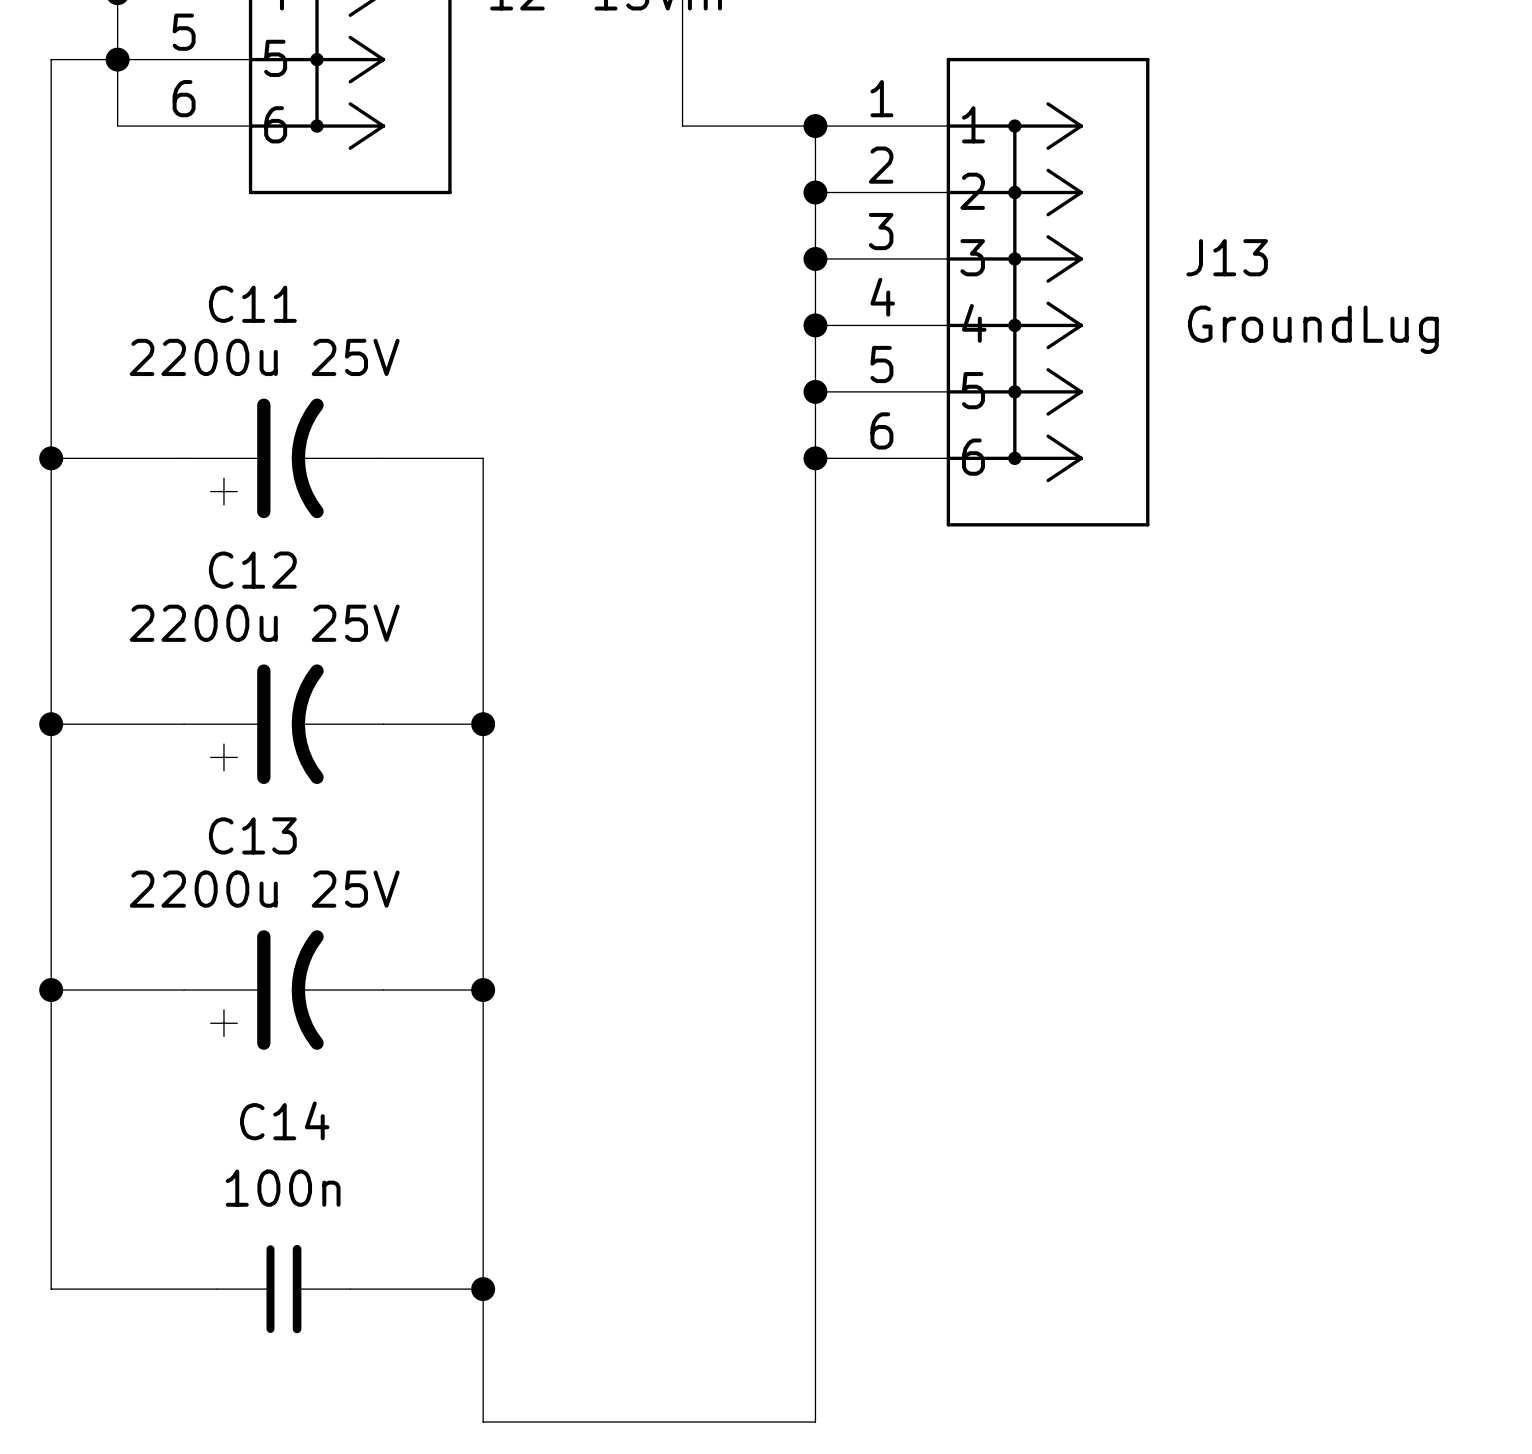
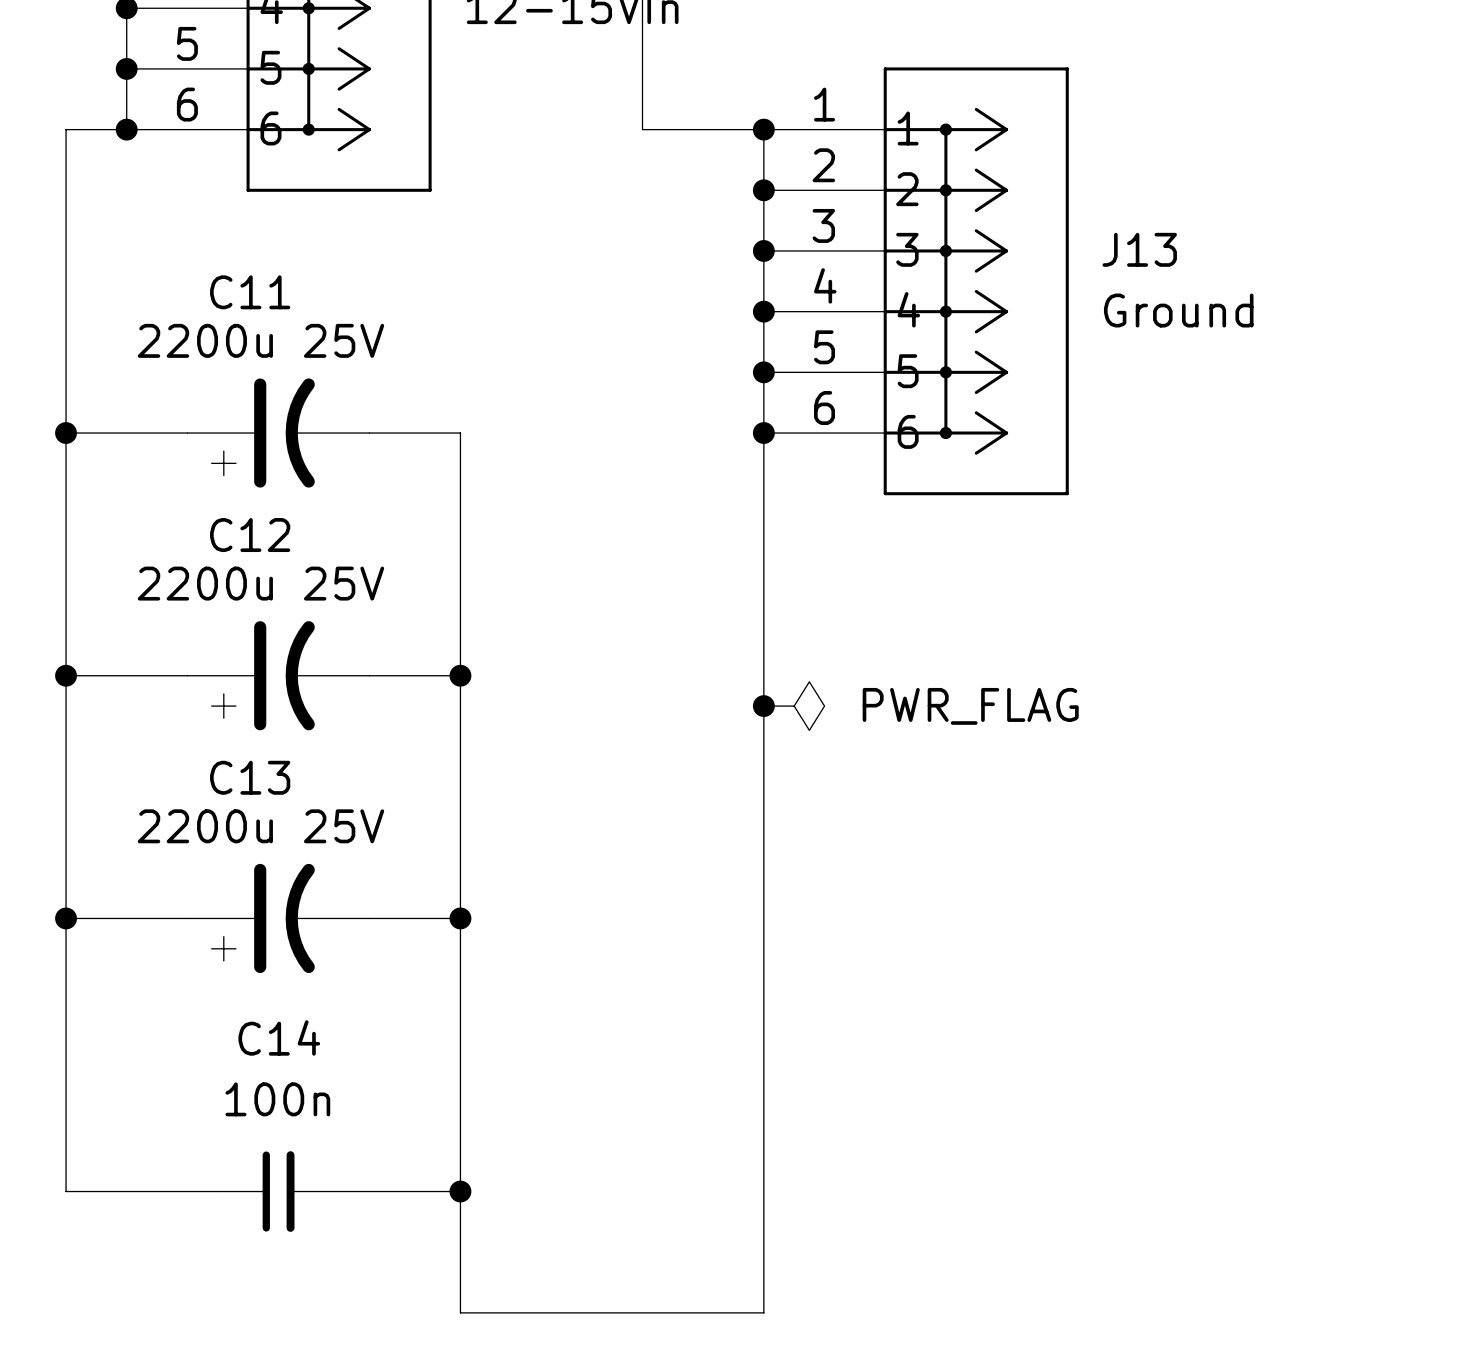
wire: (117, 59) (51, 59) (51, 126) -> (126, 129) (66, 129)
junction: none -> (126, 129)
J13 value: GroundLug (1313, 329) -> Ground (1178, 310)
junction: none -> (763, 706)
power symbol: none -> PWR_FLAG (794, 706)

